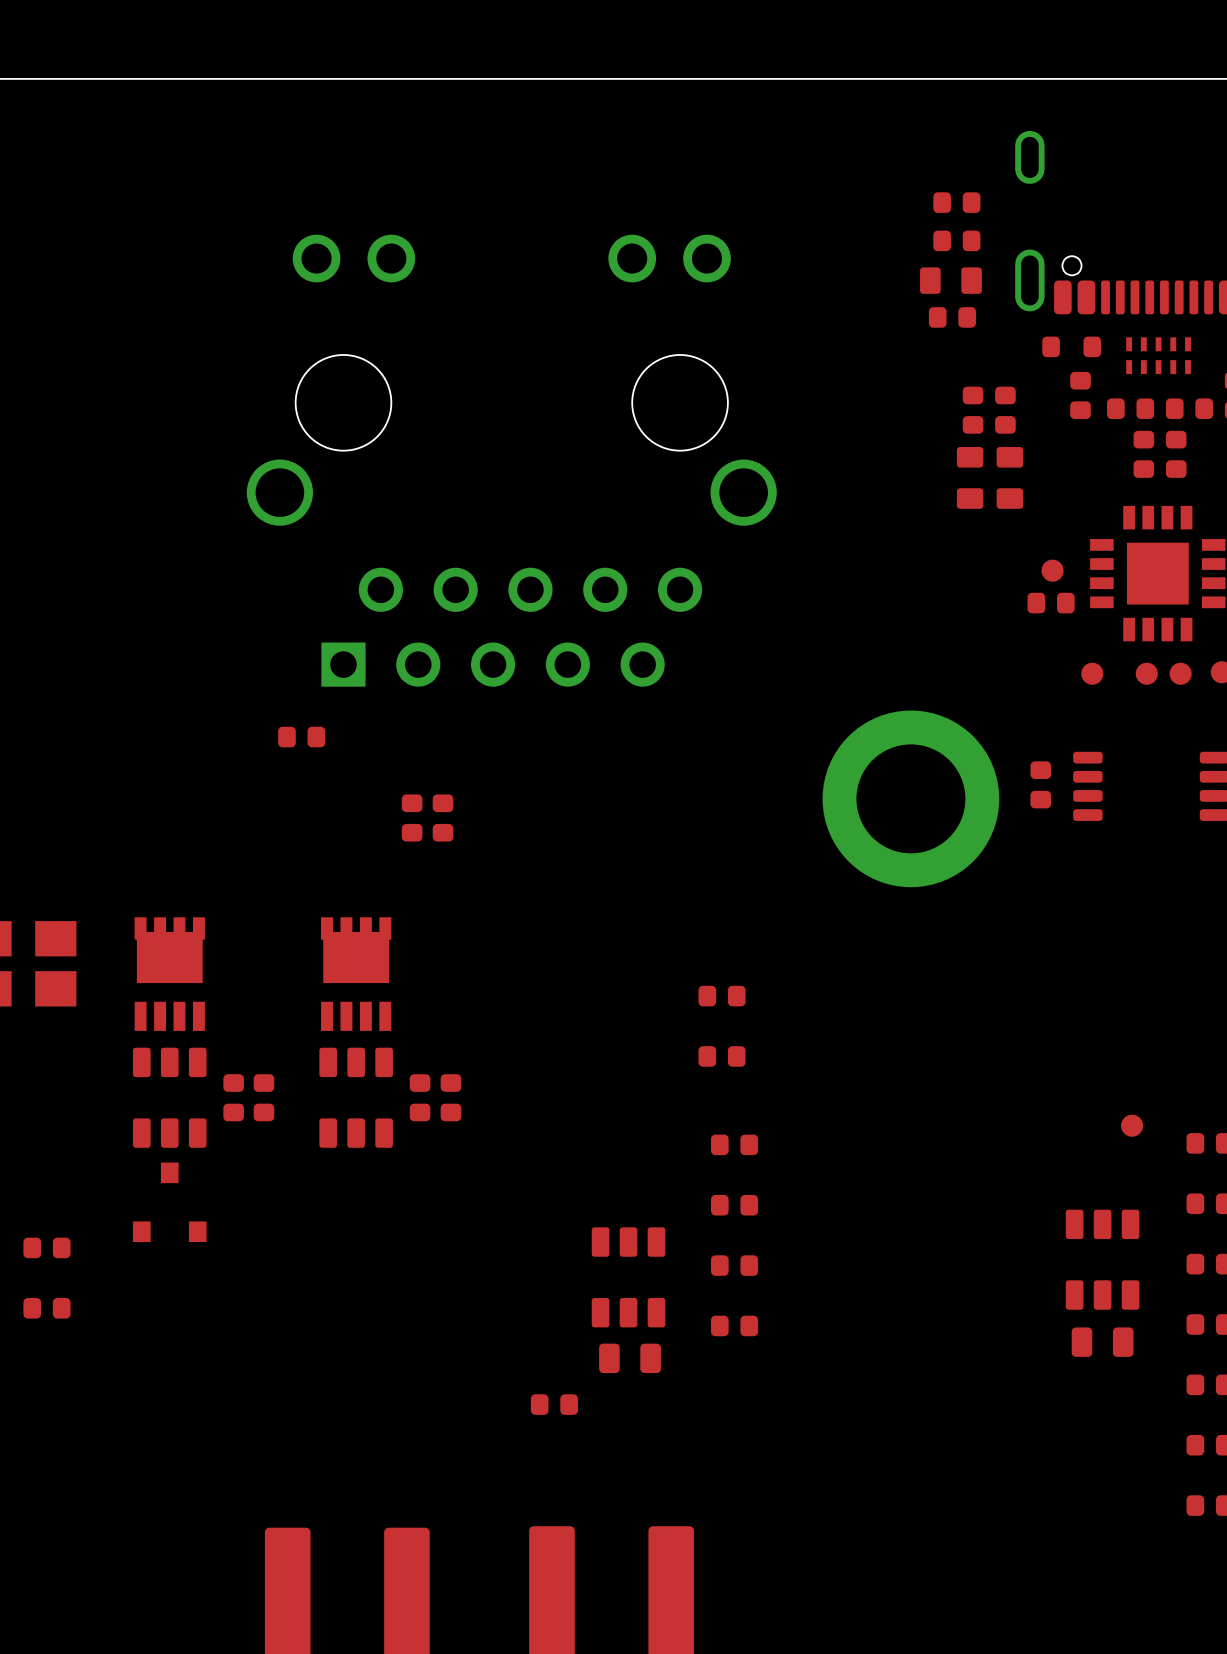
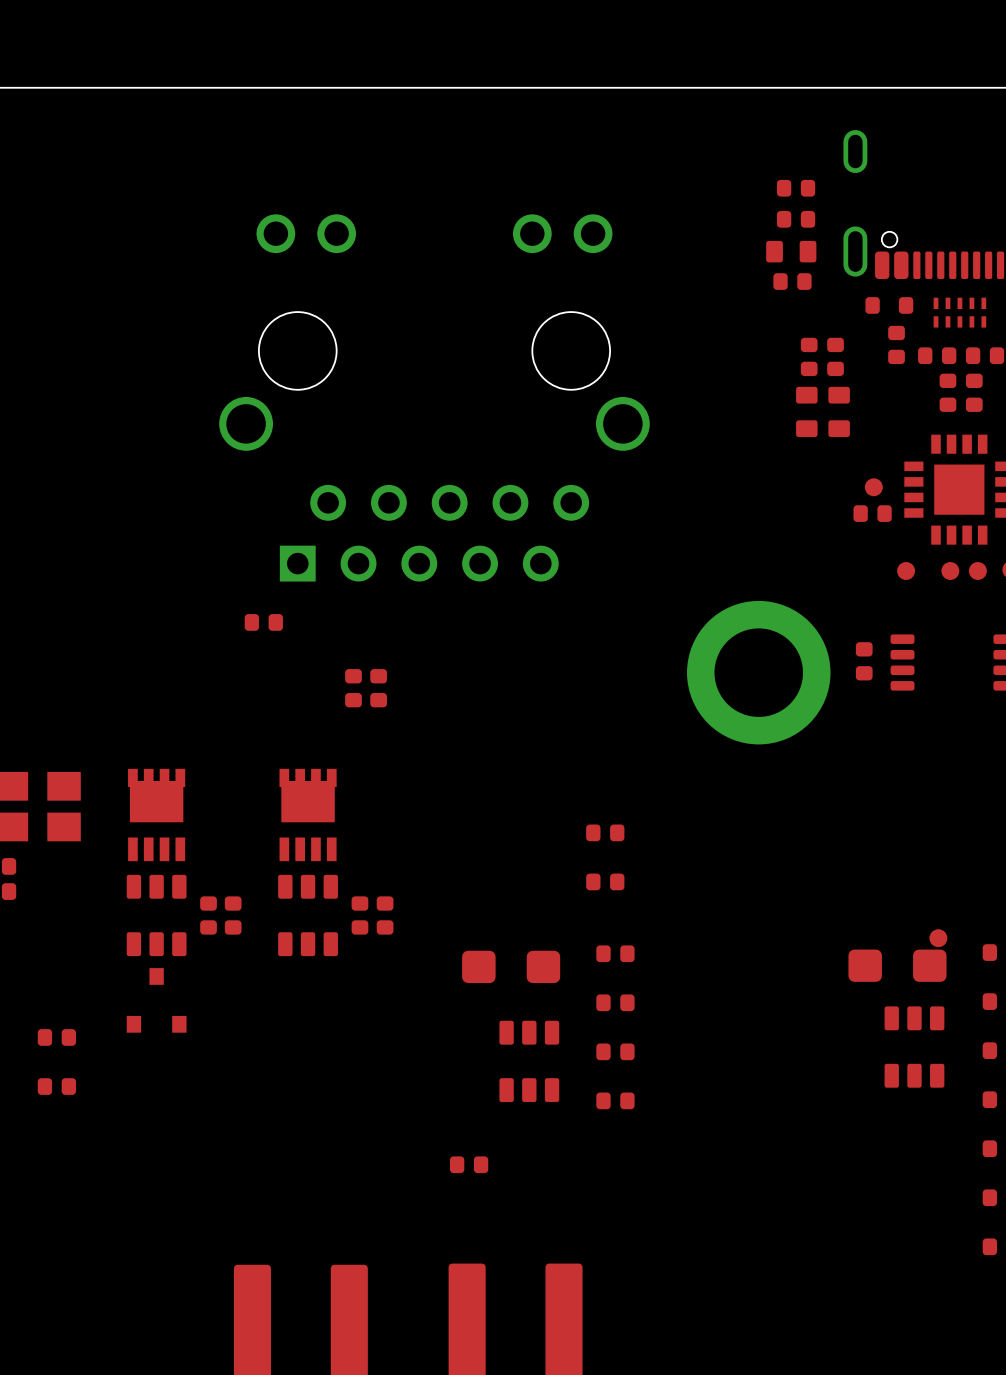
part: none -> (897, 965)
part: none -> (511, 966)
part: (1102, 1342) -> none
part: (630, 1358) -> none

